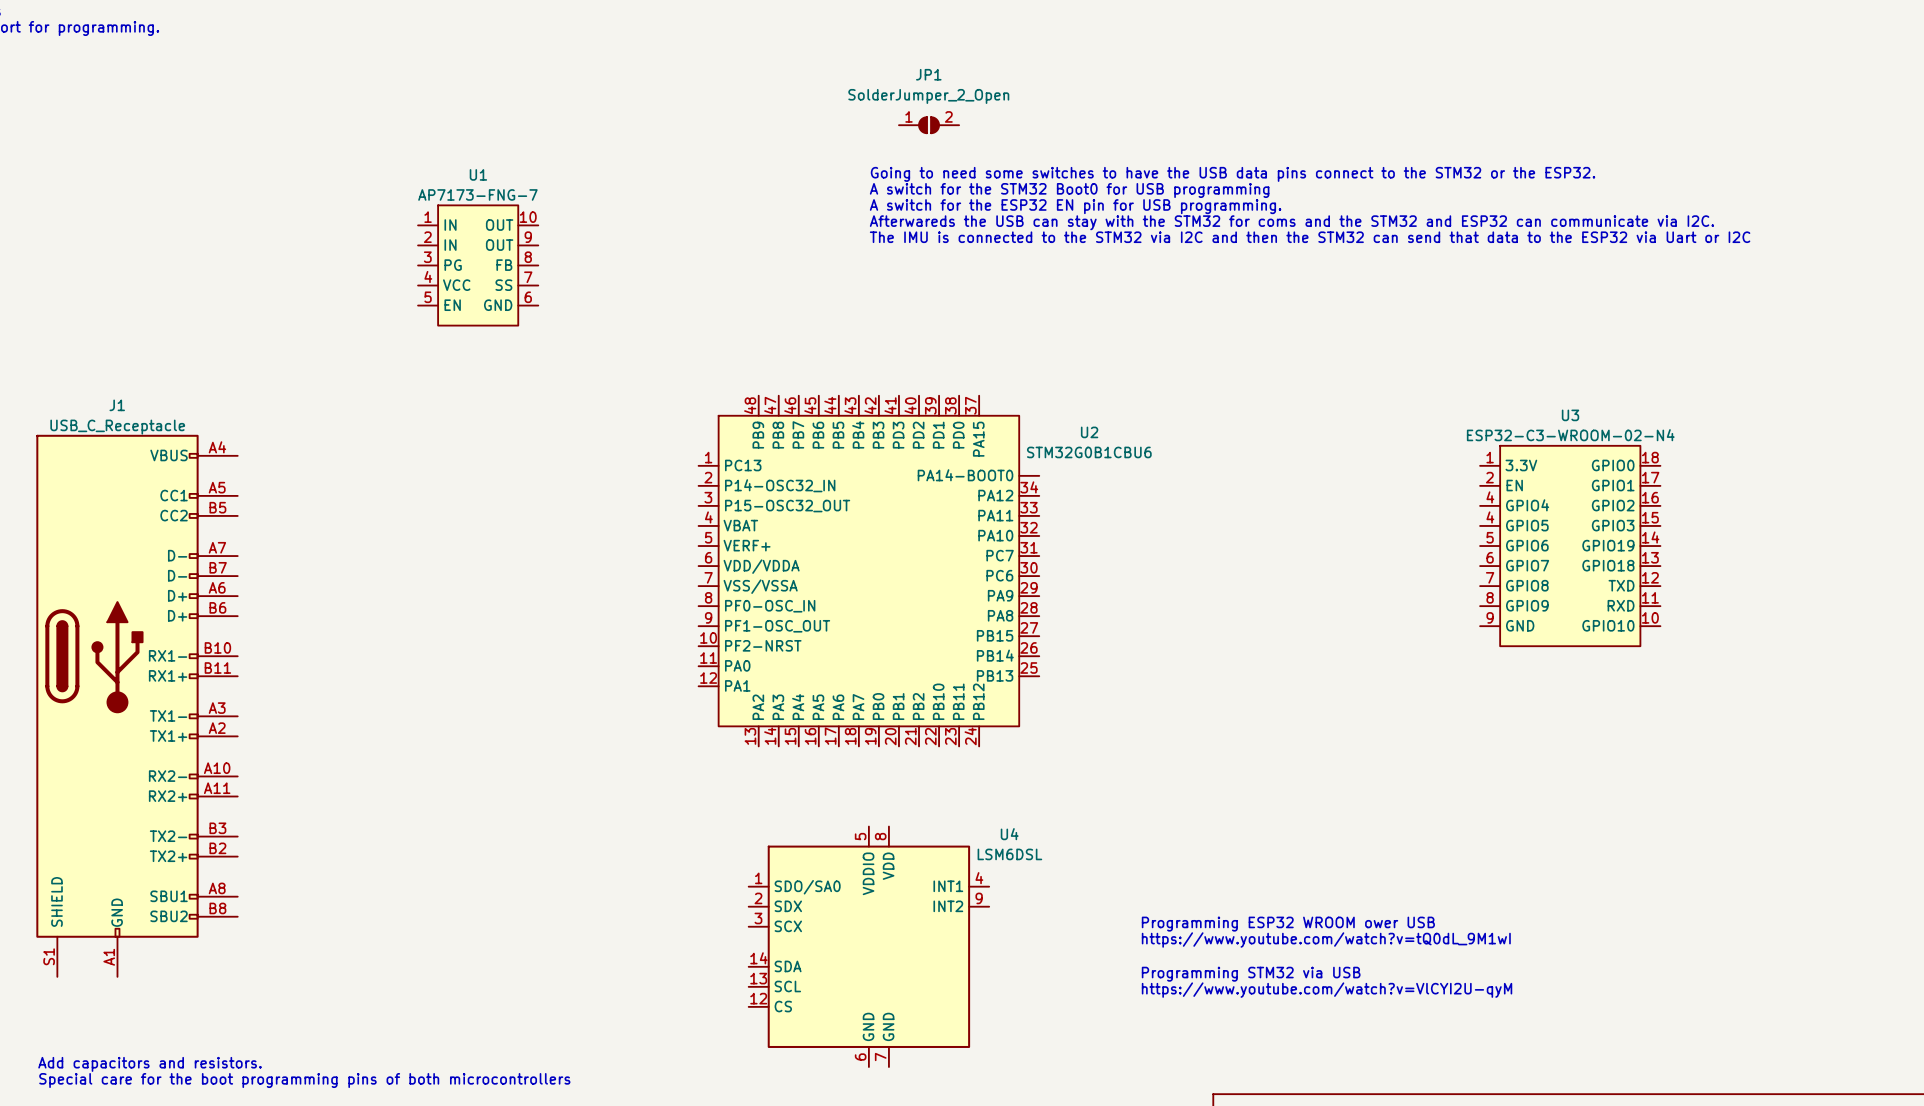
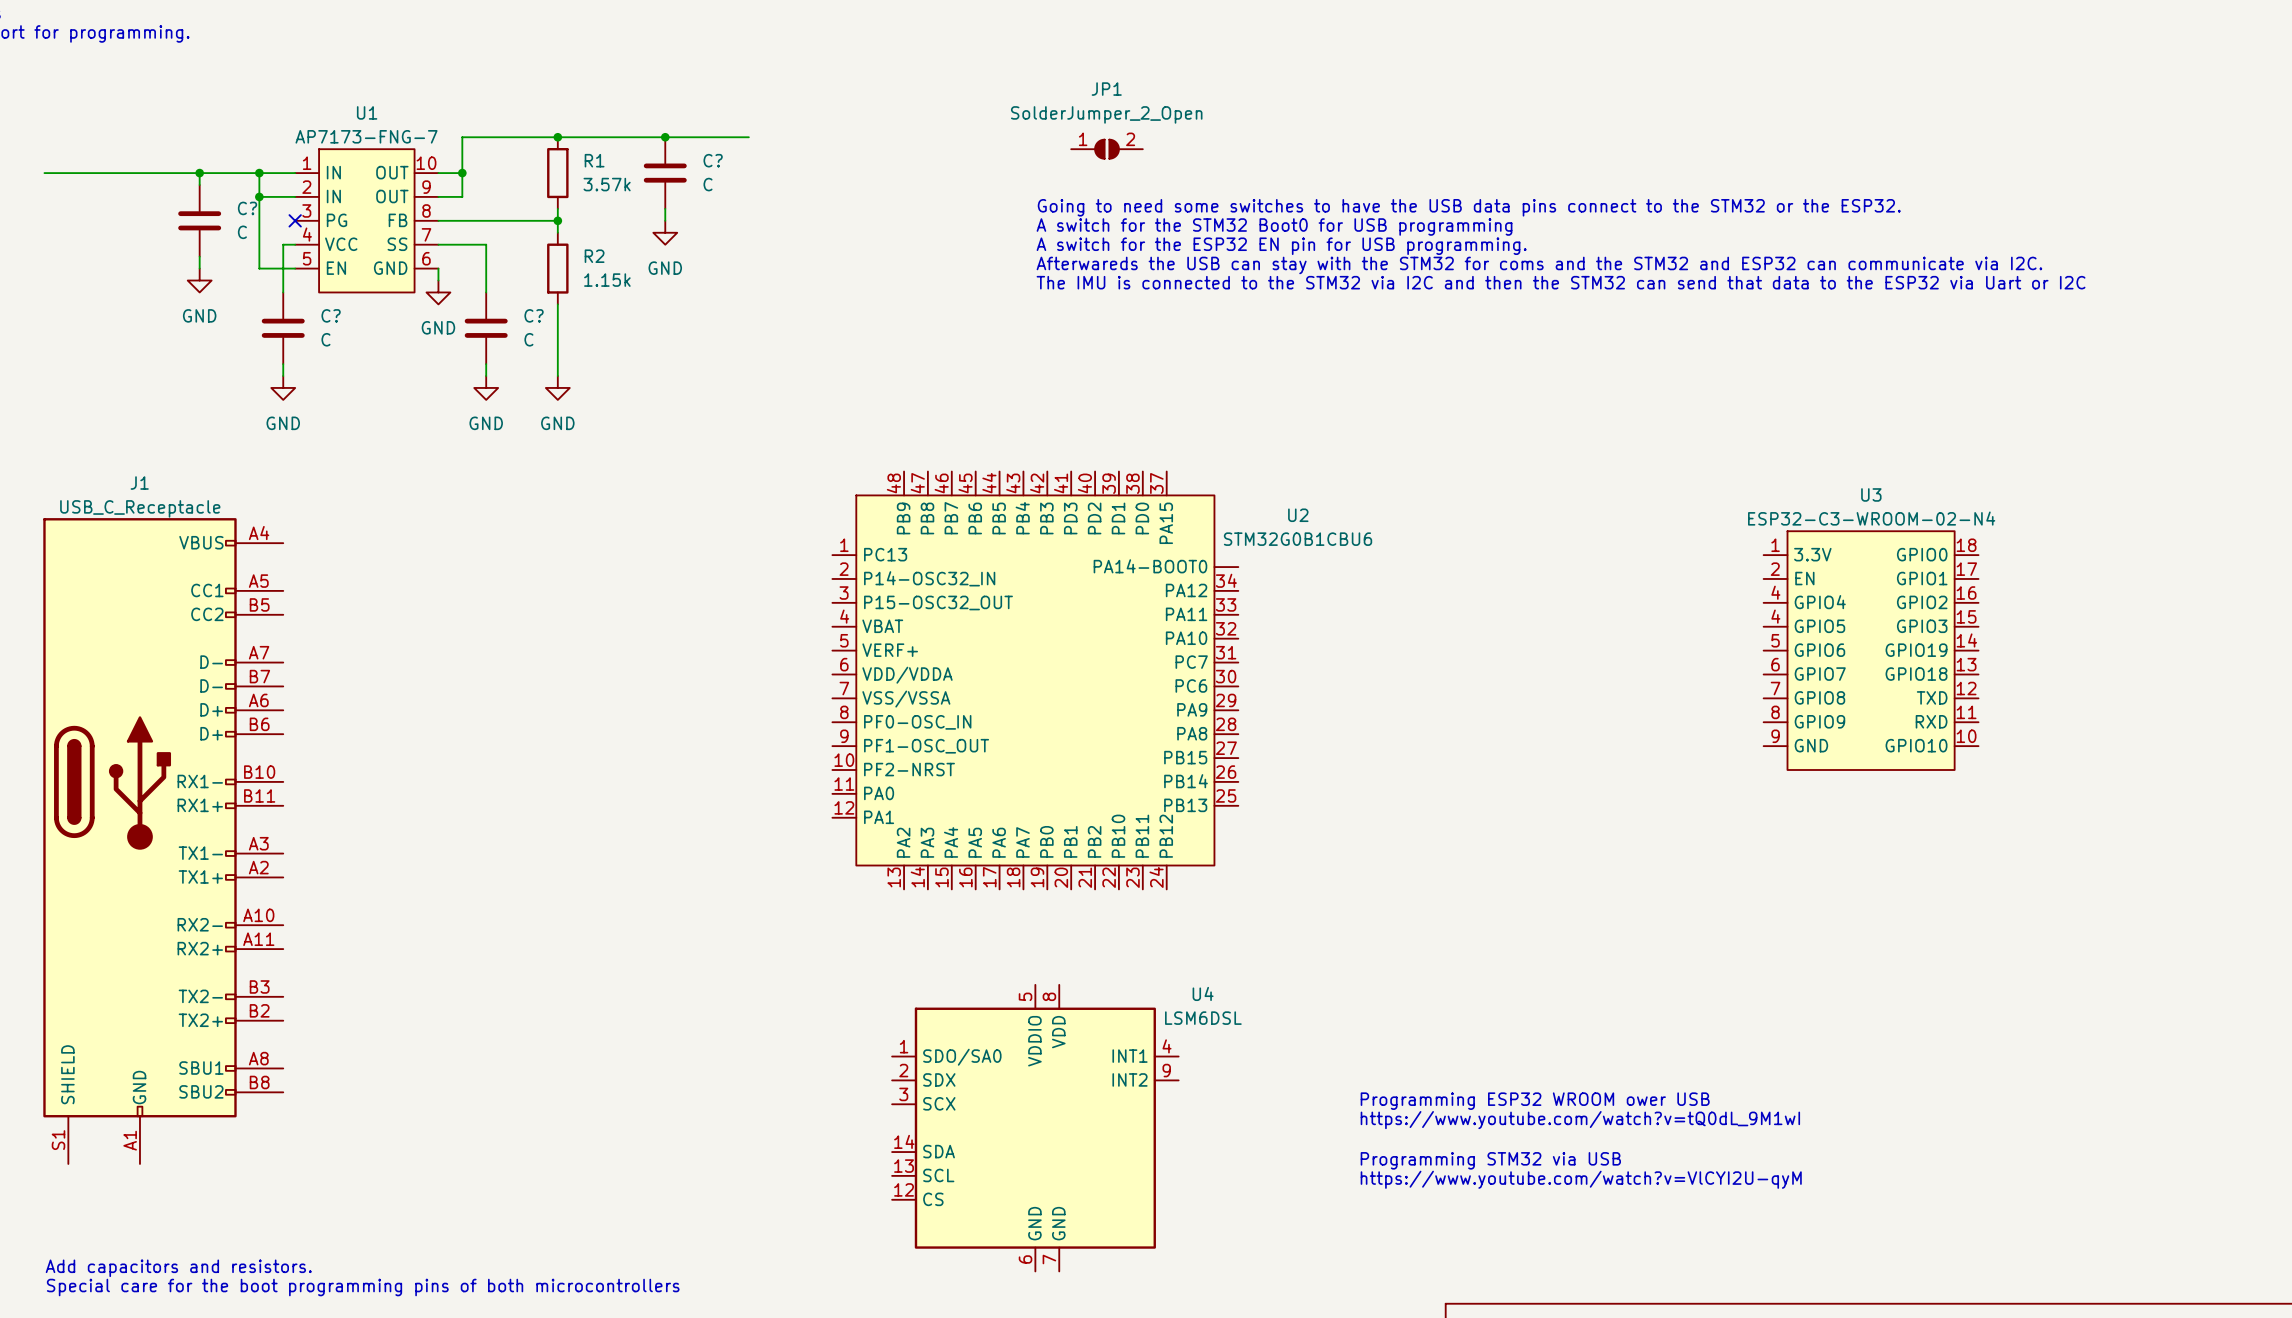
junction: none -> (557, 137)
junction: none -> (665, 137)
wire: none -> (748, 137) (462, 137) (462, 196) (438, 196)
wire: none -> (44, 173) (295, 173)
wire: none -> (199, 173) (199, 185)
junction: none -> (199, 173)
wire: none -> (259, 173) (259, 268) (295, 268)
junction: none -> (259, 173)
wire: none -> (438, 173) (462, 173)
junction: none -> (462, 173)
R1: none -> 3.57k (557, 173)
C?: none -> C (665, 173)
wire: none -> (259, 196) (295, 196)
junction: none -> (259, 196)
wire: none -> (557, 208) (557, 232)
wire: none -> (665, 208) (665, 220)
C?: none -> C (199, 220)
no-connect mark: none -> (295, 220)
wire: none -> (438, 220) (557, 220)
junction: none -> (557, 220)
power symbol: none -> GND (665, 232)
wire: none -> (295, 244) (283, 244) (283, 292)
wire: none -> (438, 244) (486, 244) (486, 292)
wire: none -> (199, 256) (199, 268)
wire: none -> (438, 268) (438, 280)
R2: none -> 1.15k (557, 268)
power symbol: none -> GND (199, 280)
power symbol: none -> GND (438, 292)
U1 position: (478, 265) -> (366, 220)
C?: none -> C (283, 328)
C?: none -> C (486, 328)
wire: none -> (283, 364) (283, 376)
wire: none -> (486, 364) (486, 376)
power symbol: none -> GND (283, 387)
power symbol: none -> GND (486, 387)
power symbol: none -> GND (557, 387)

